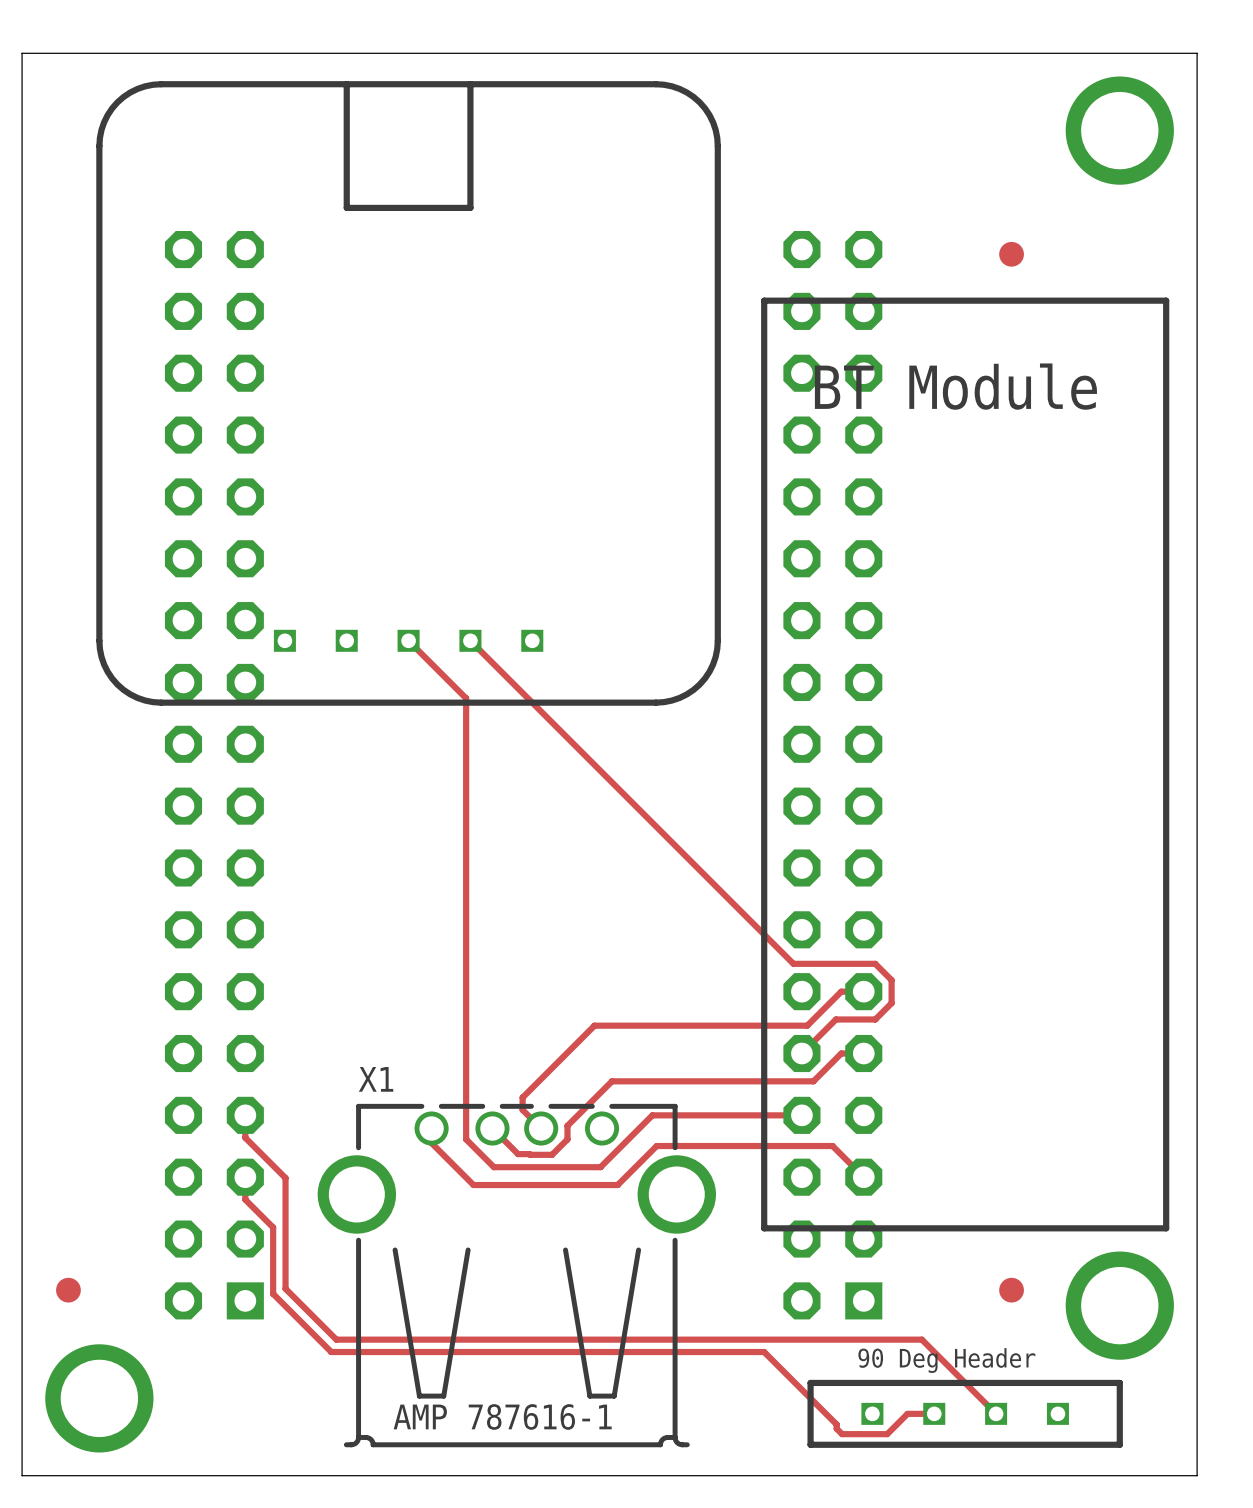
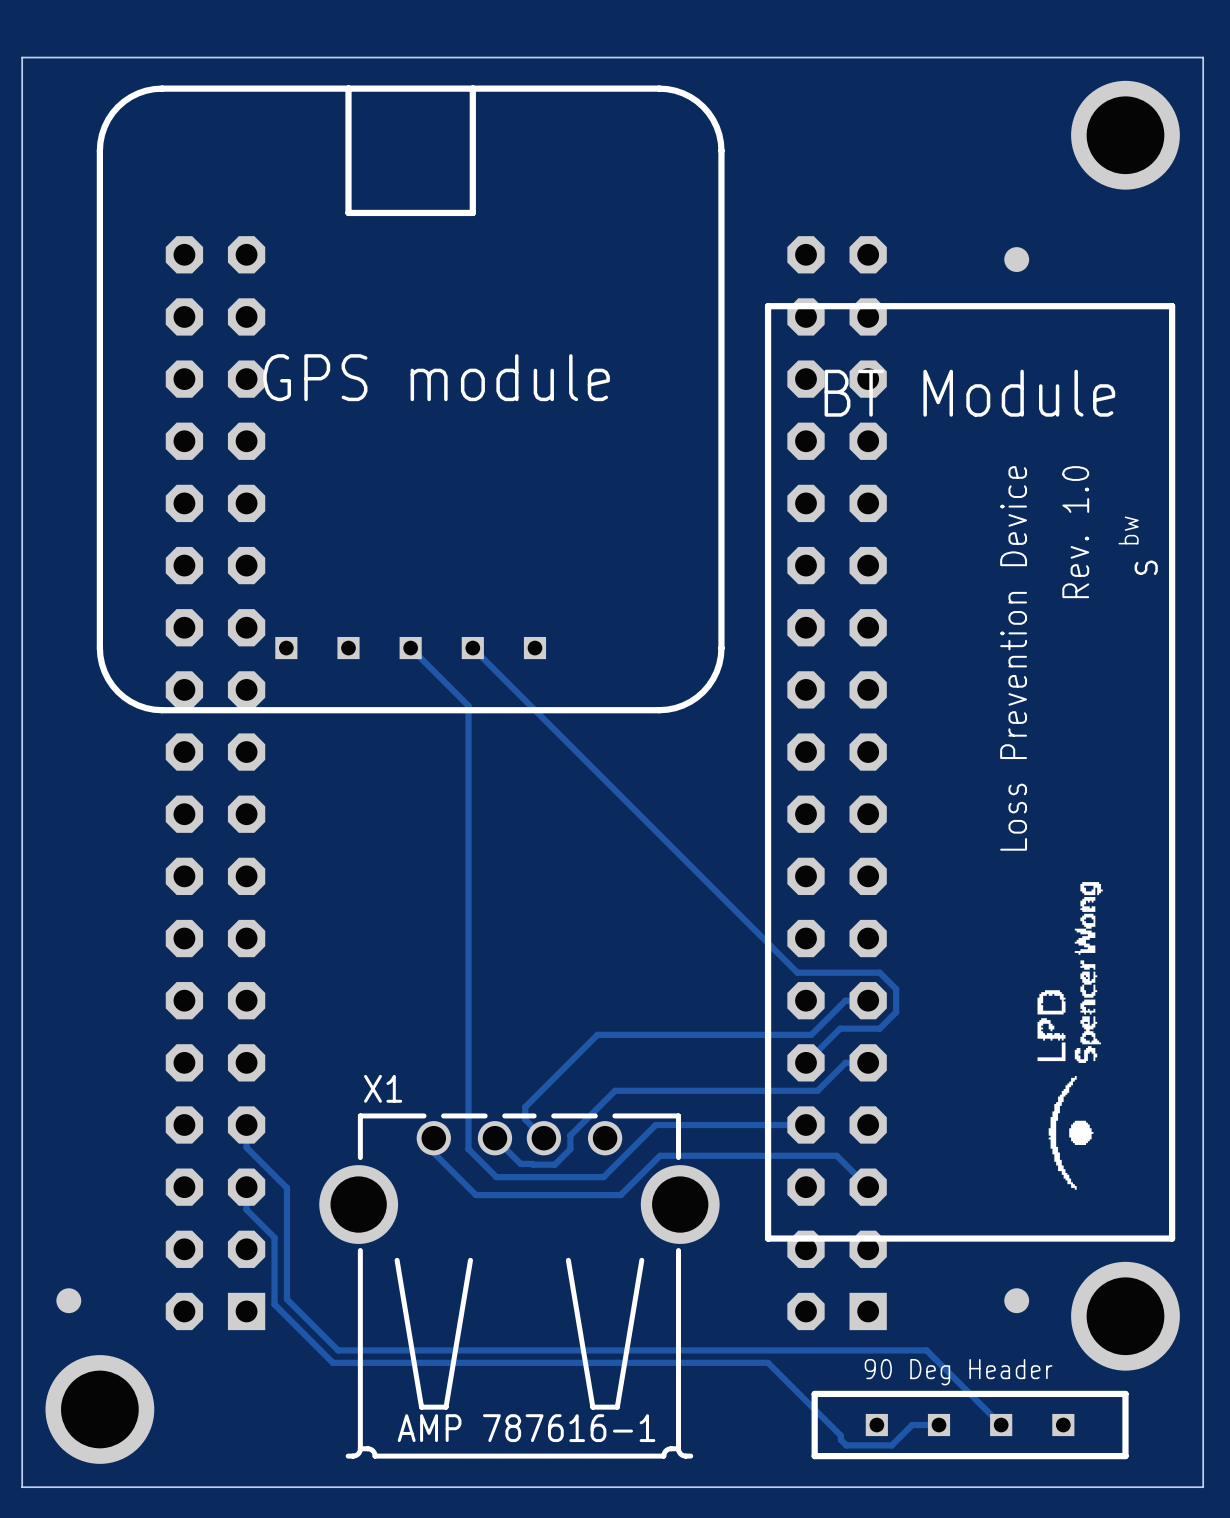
part text: none -> GPS module (436, 377)
text: none -> bw (1128, 530)
text: none -> Rev. 1.0 (1075, 532)
text: none -> s (1146, 567)
text: none -> Loss Prevention Device (1013, 658)
drawing: none -> [1037, 882, 1103, 1190]

